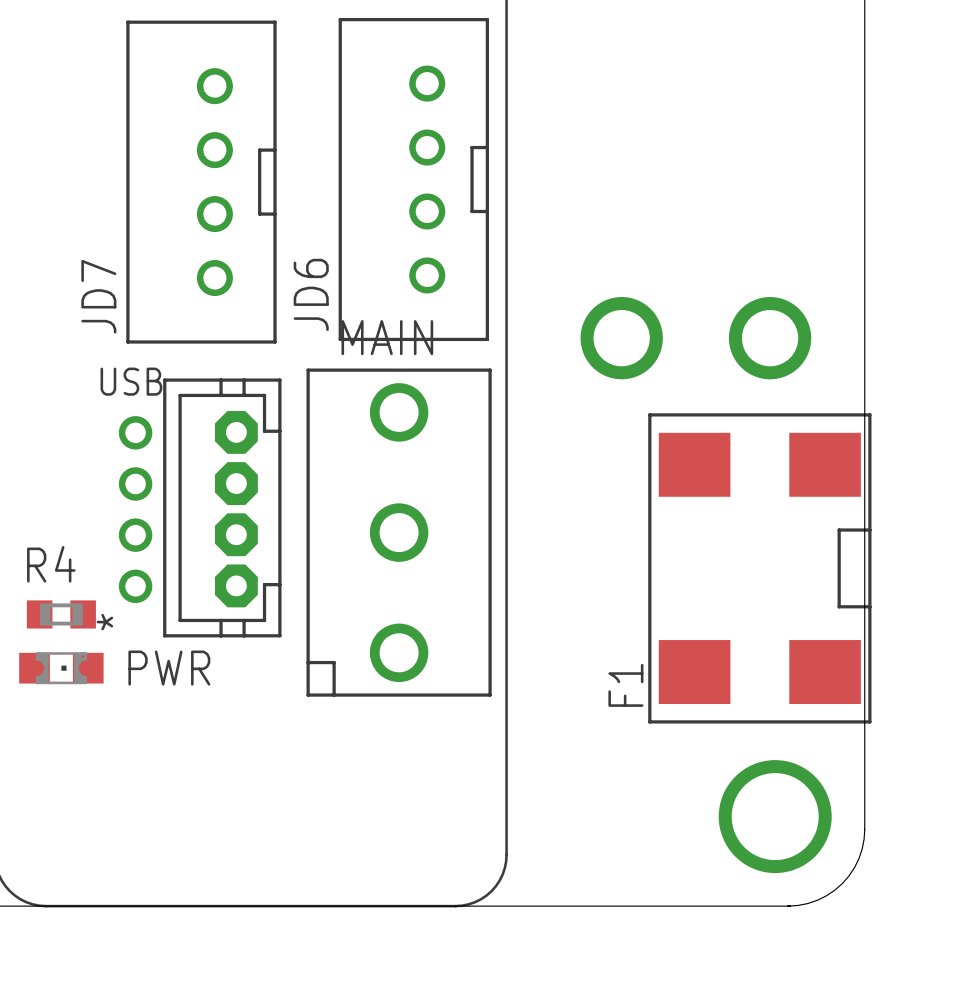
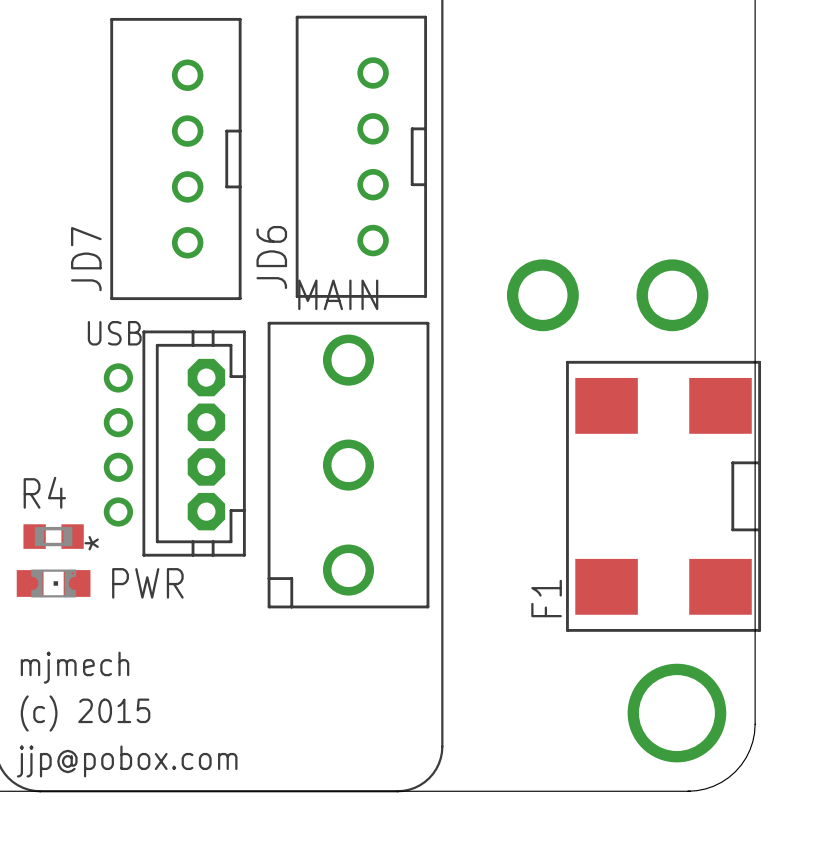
text: none -> mjmech (75, 667)
text: none -> (c) 2015 (85, 713)
text: none -> jjp@pobox.com (127, 761)

